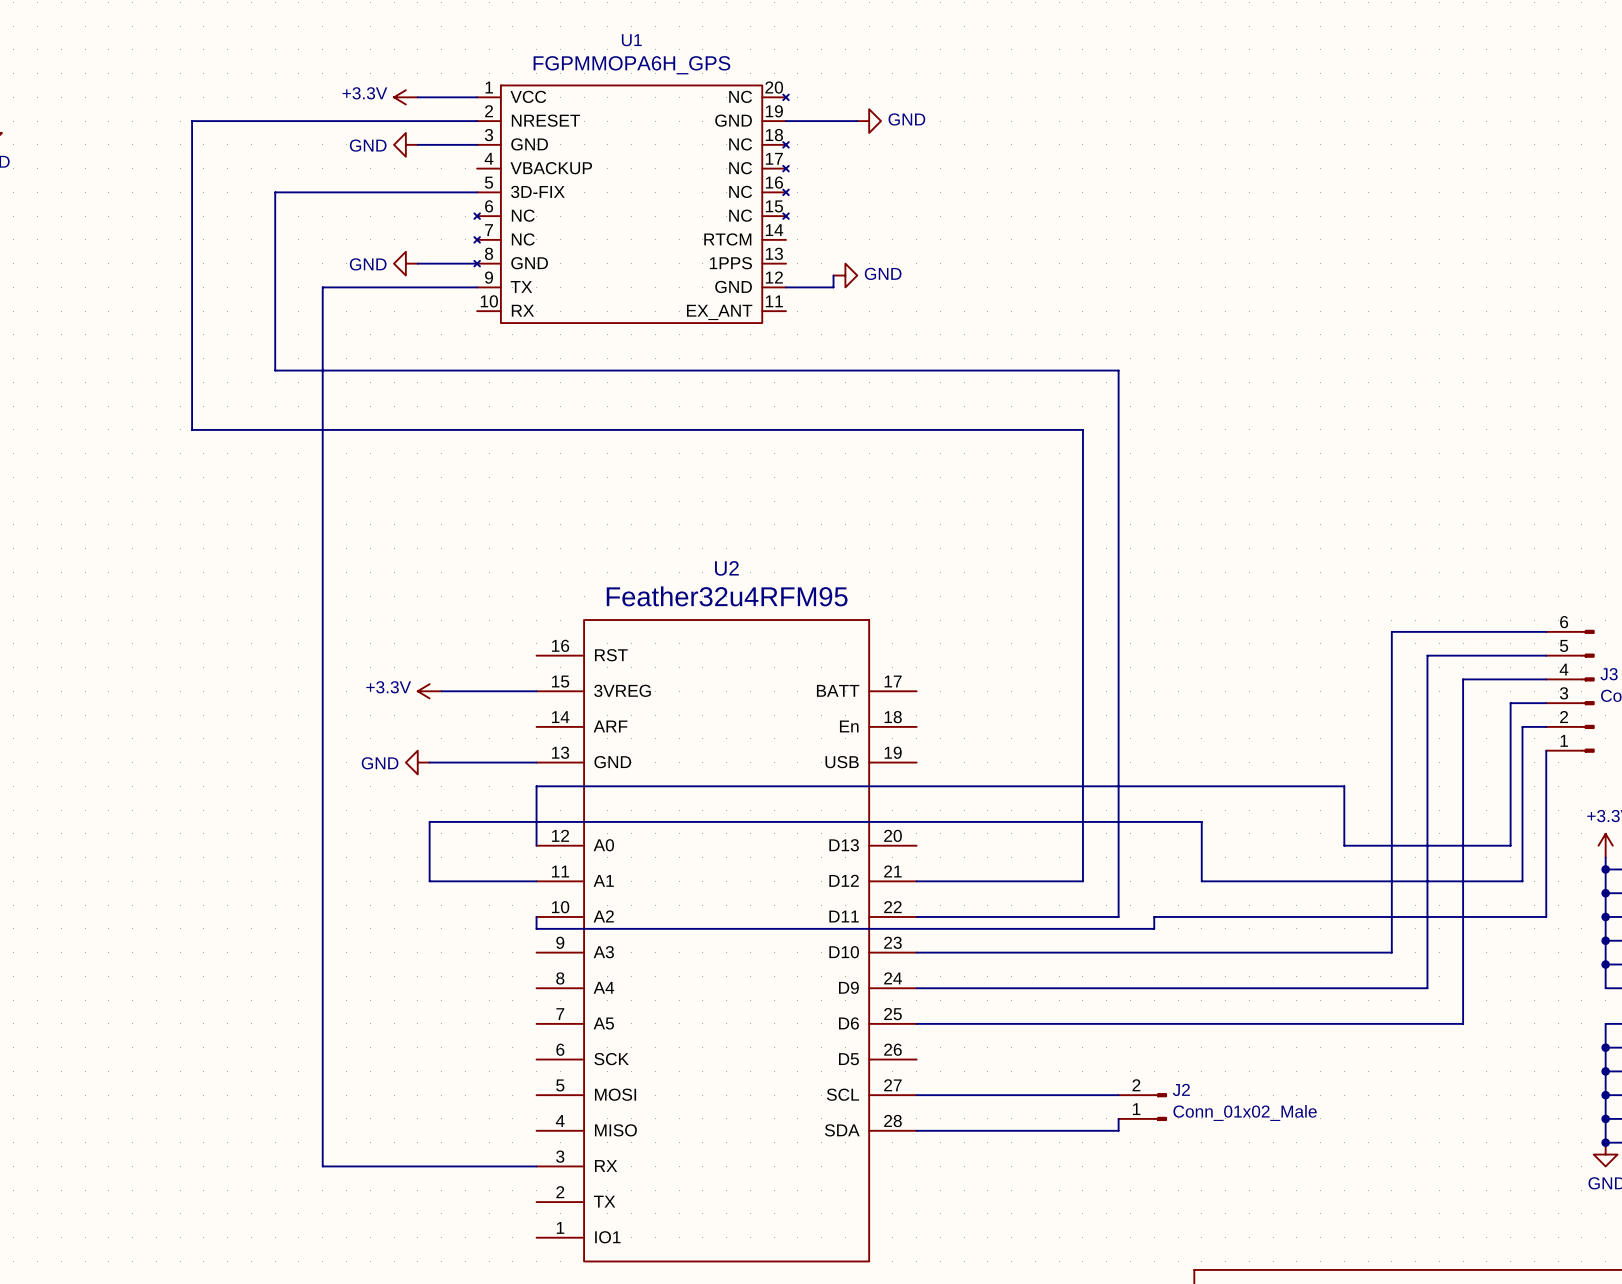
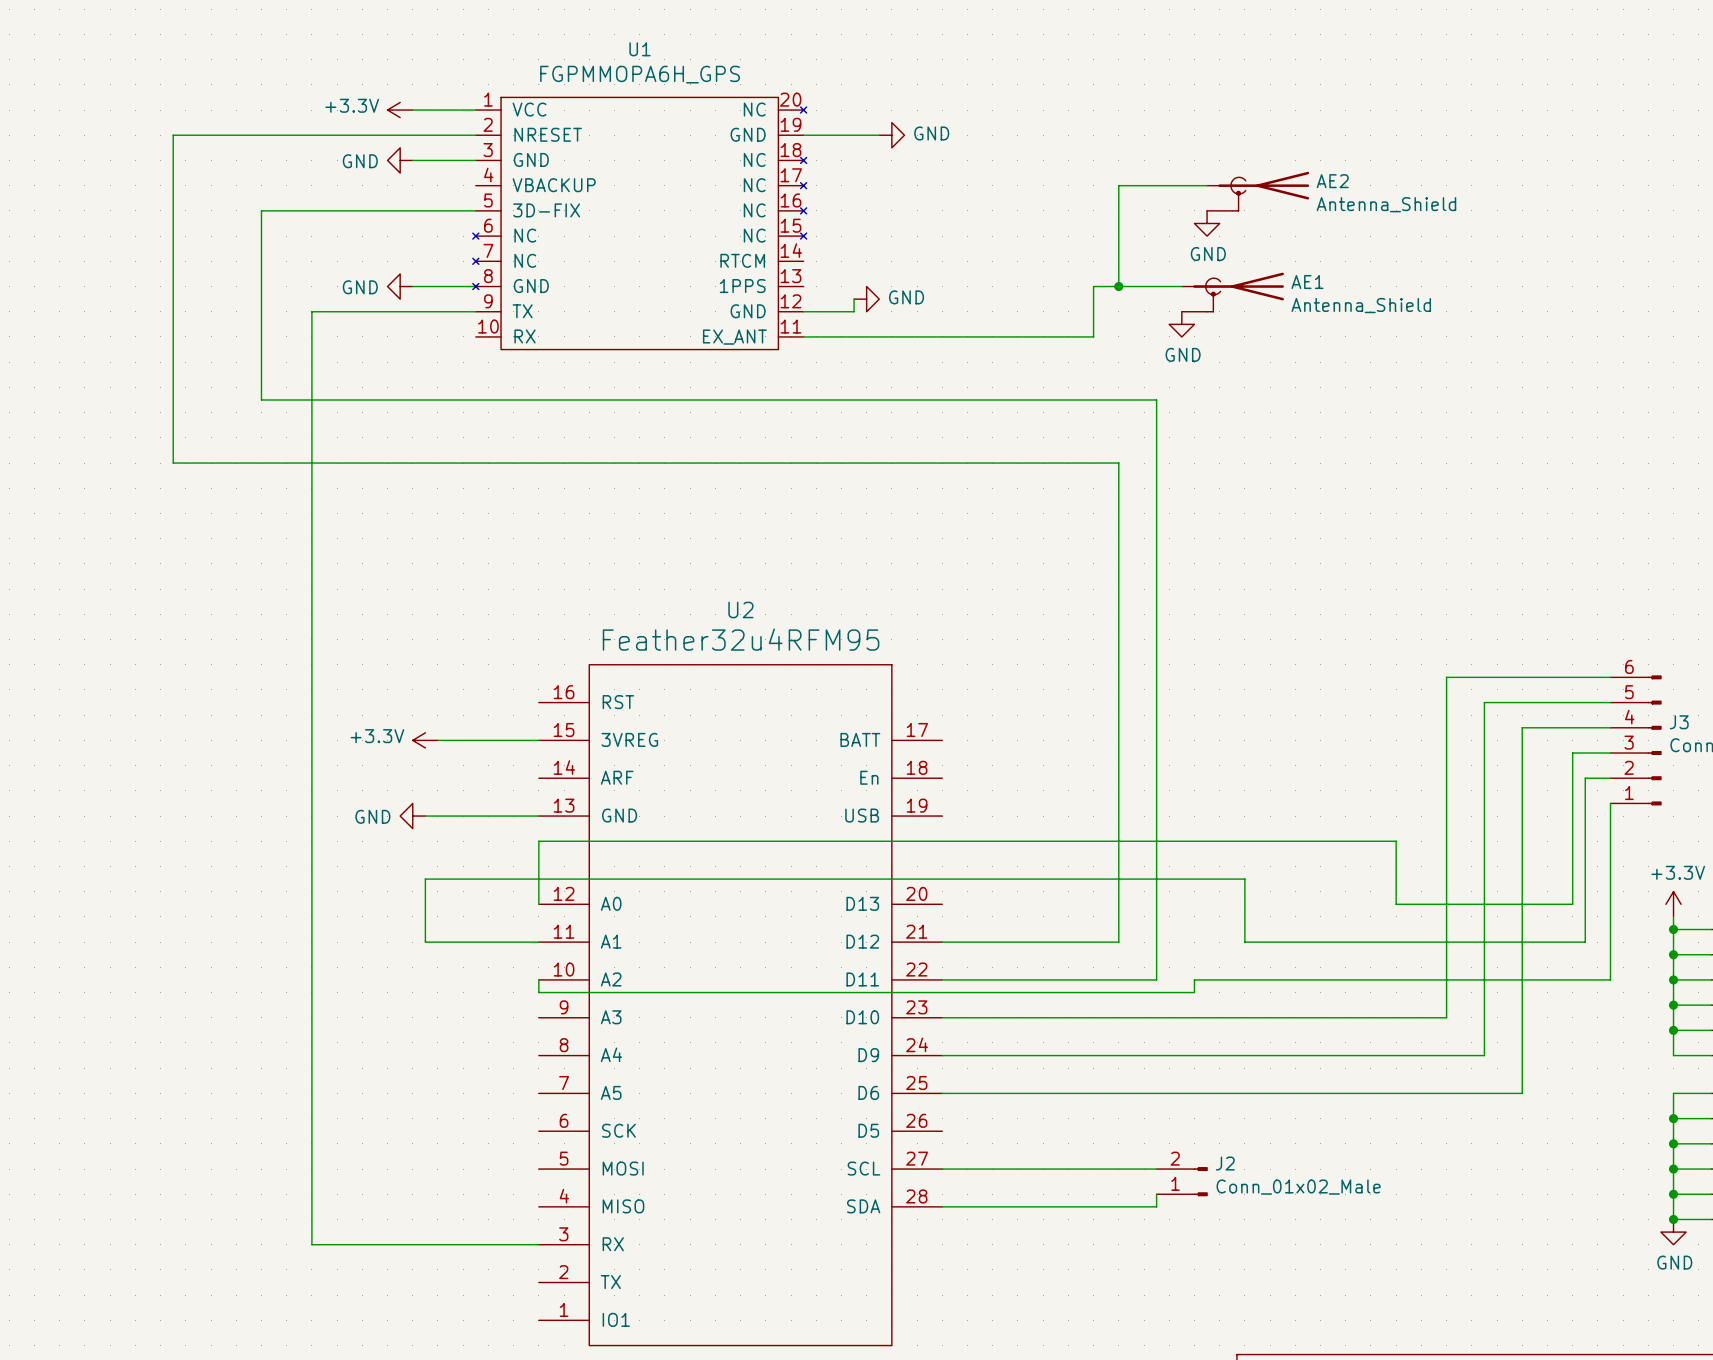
wire: none -> (1207, 185) (1118, 185) (1118, 286)
AE2: none -> Antenna_Shield (1258, 191)
power symbol: none -> GND (1207, 223)
junction: none -> (1118, 286)
wire: none -> (1181, 286) (1093, 286) (1093, 336) (803, 336)
AE1: none -> Antenna_Shield (1232, 292)
power symbol: none -> GND (1181, 324)

